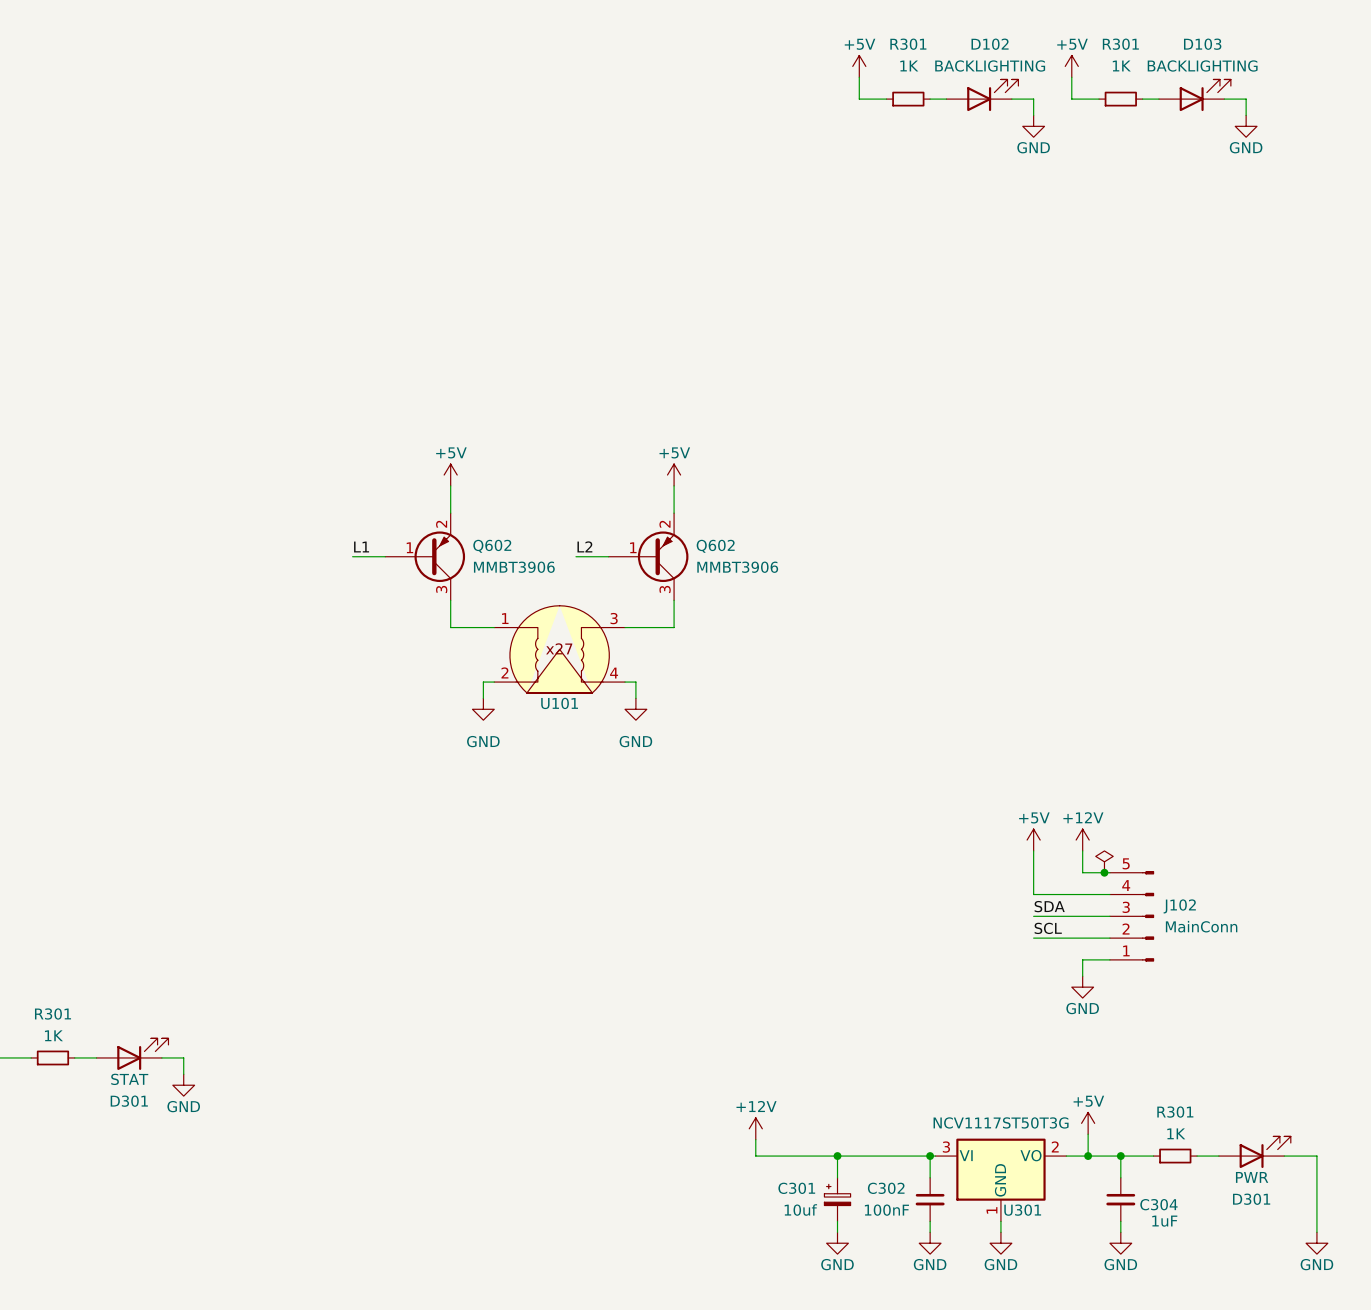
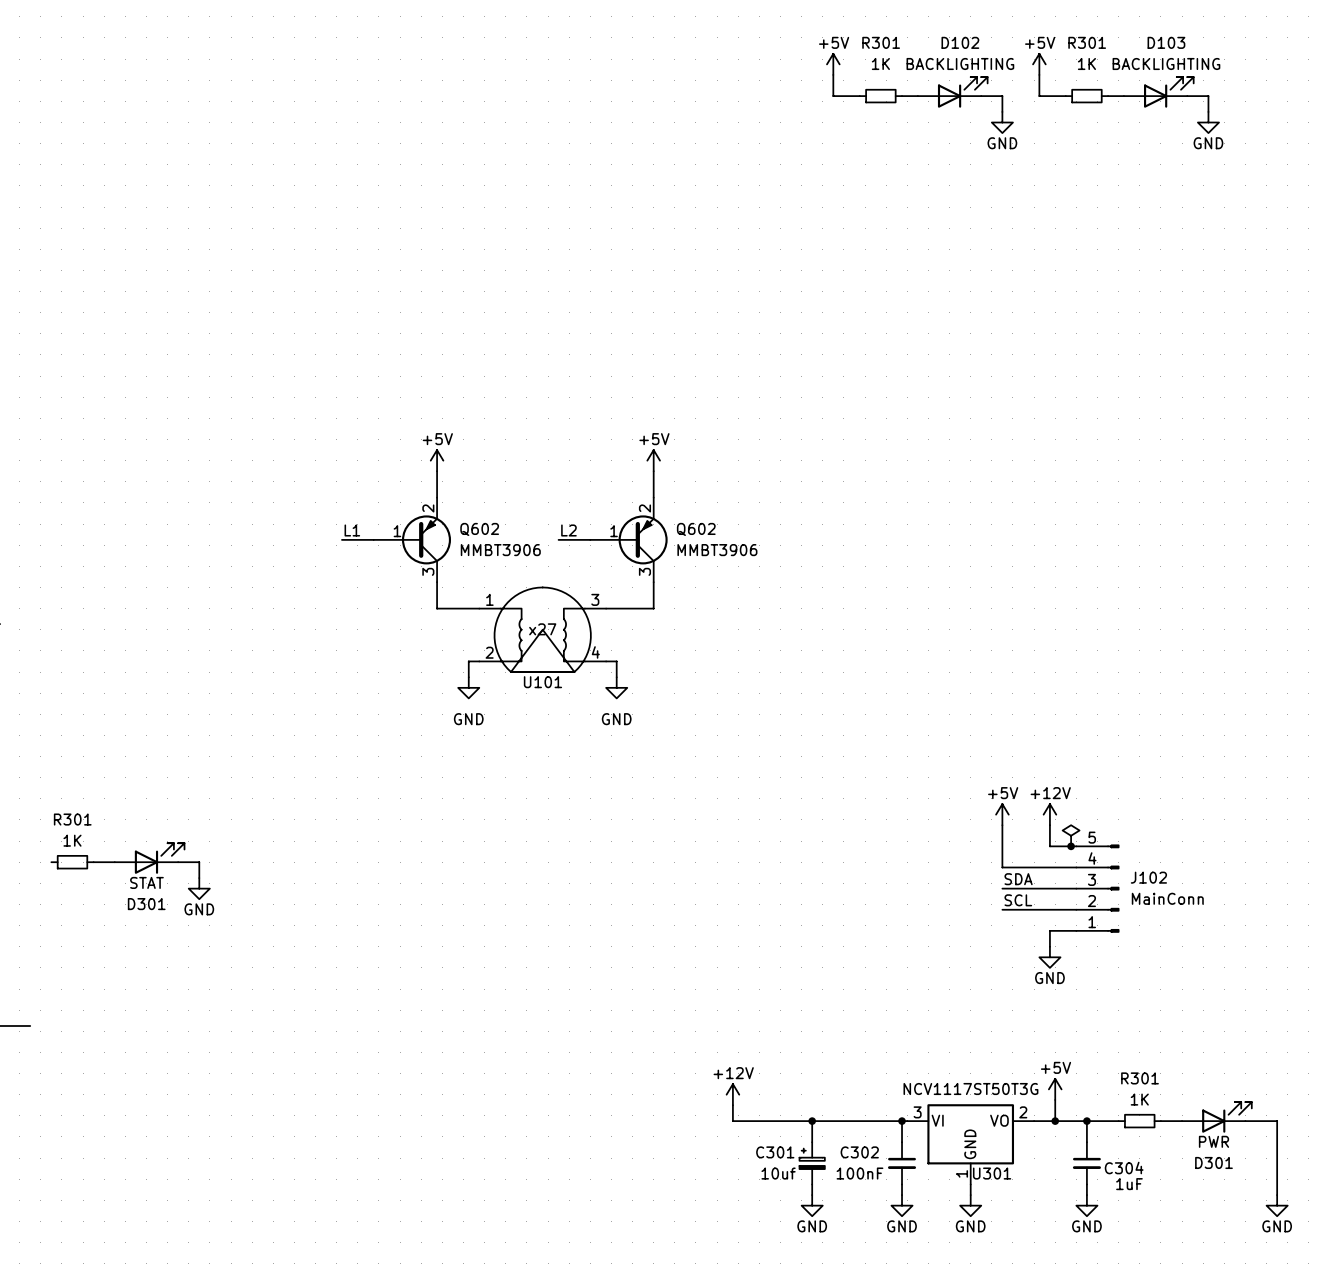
D301 position: (132, 1054) -> (149, 858)
R301 position: (52, 1057) -> (72, 862)
wire: (74, 1057) (96, 1057) -> (93, 862) (114, 862)
wire: (161, 1057) (183, 1057) (183, 1074) -> (178, 862) (199, 862) (199, 878)
power symbol position: GND (183, 1085) -> GND (199, 888)

